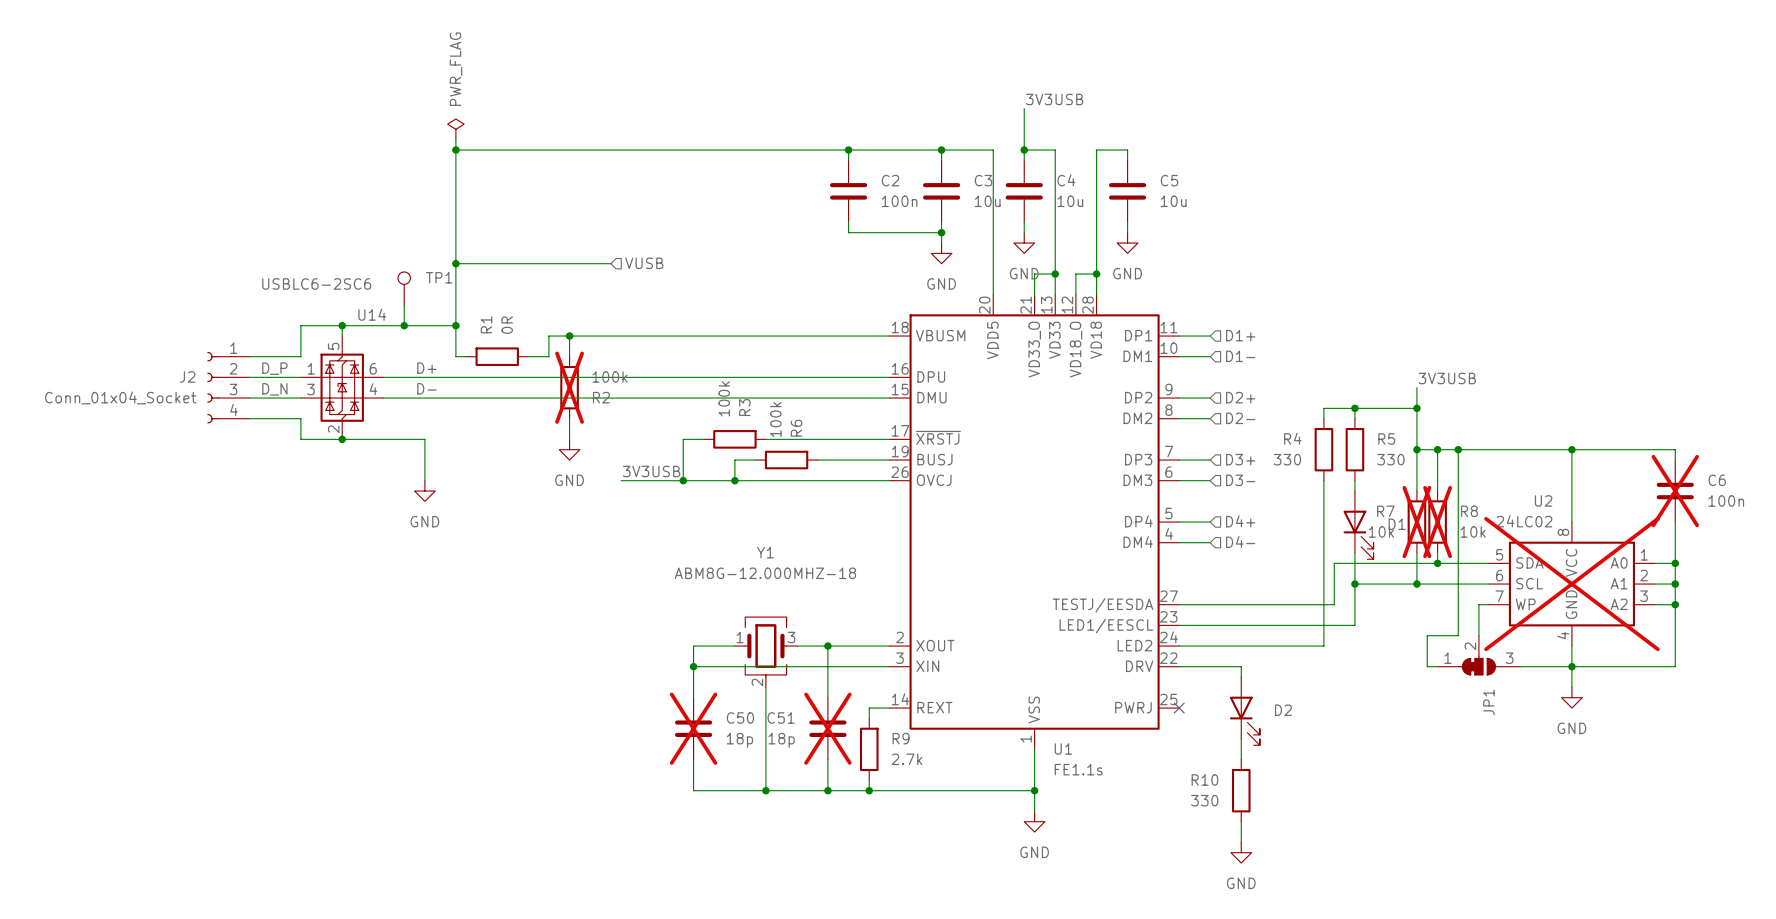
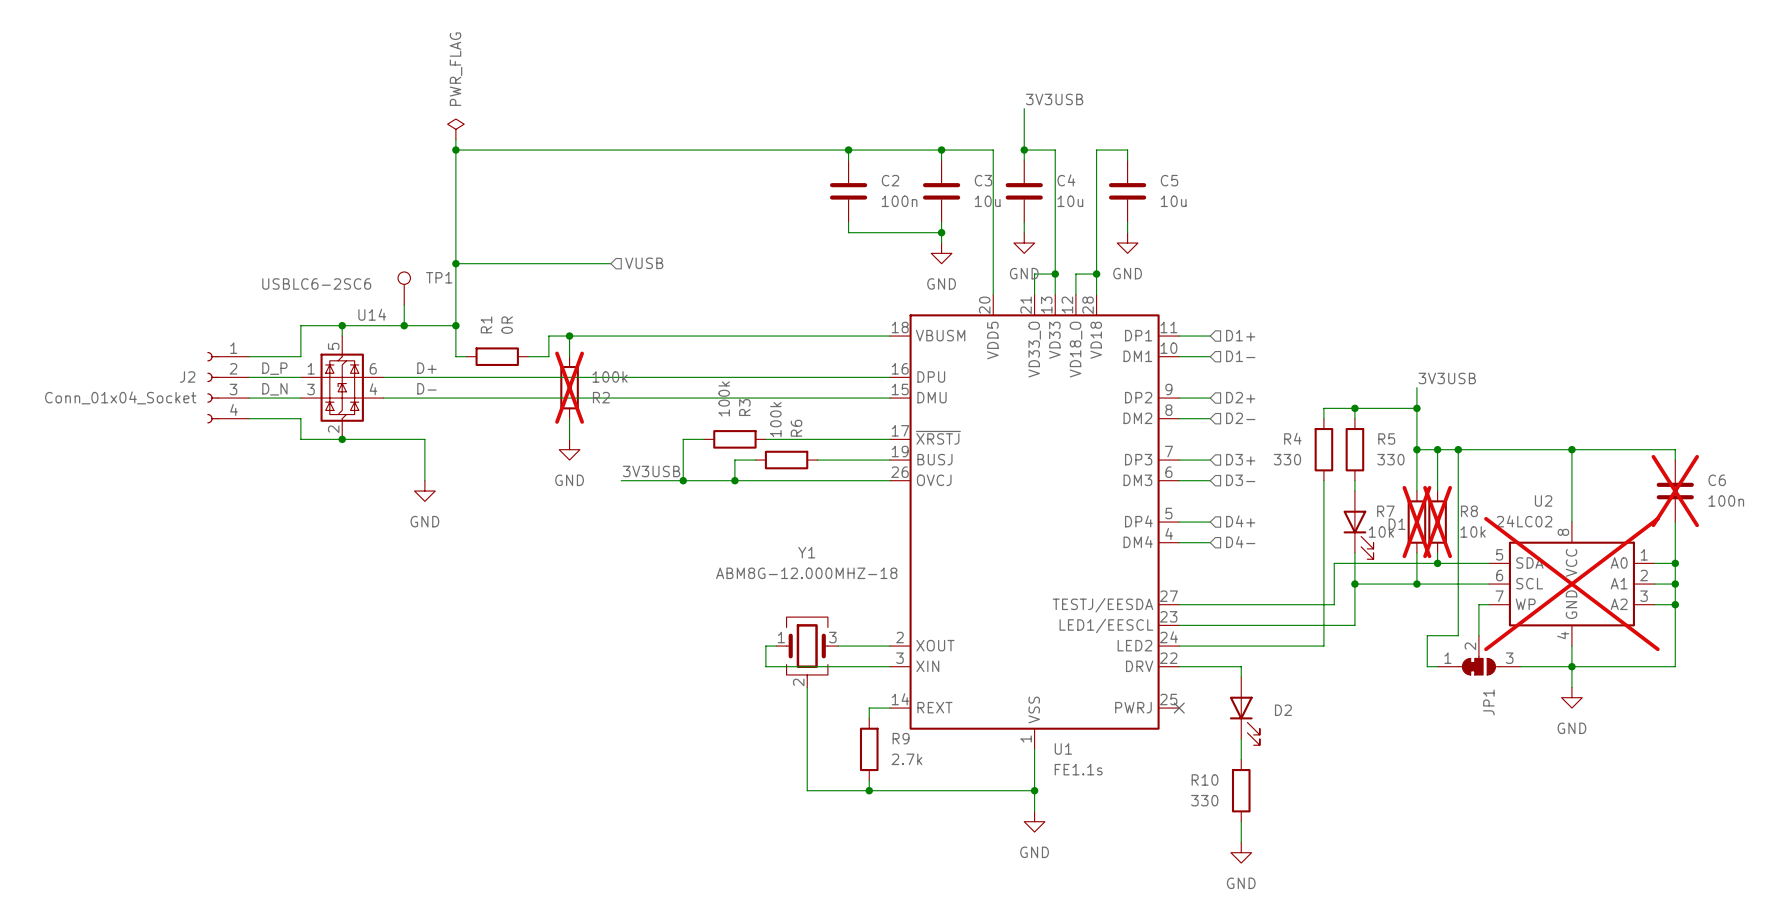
wire: (734, 646) (693, 646) (693, 697) -> none
wire: (796, 646) (838, 646) -> none
wire: (827, 646) (827, 697) -> none
junction: (827, 646) -> none
Y1 position: (765, 652) -> (807, 652)
wire: (693, 666) (765, 666) -> (776, 646) (765, 646) (765, 666)
junction: (693, 666) -> none
wire: (765, 687) (765, 790) -> none
C50: 18p (693, 728) -> none
C51: 18p (827, 728) -> none
wire: (693, 759) (693, 790) (807, 790) -> (807, 687) (807, 790)
wire: (827, 759) (827, 790) -> none
junction: (765, 790) -> none
junction: (827, 790) -> none

